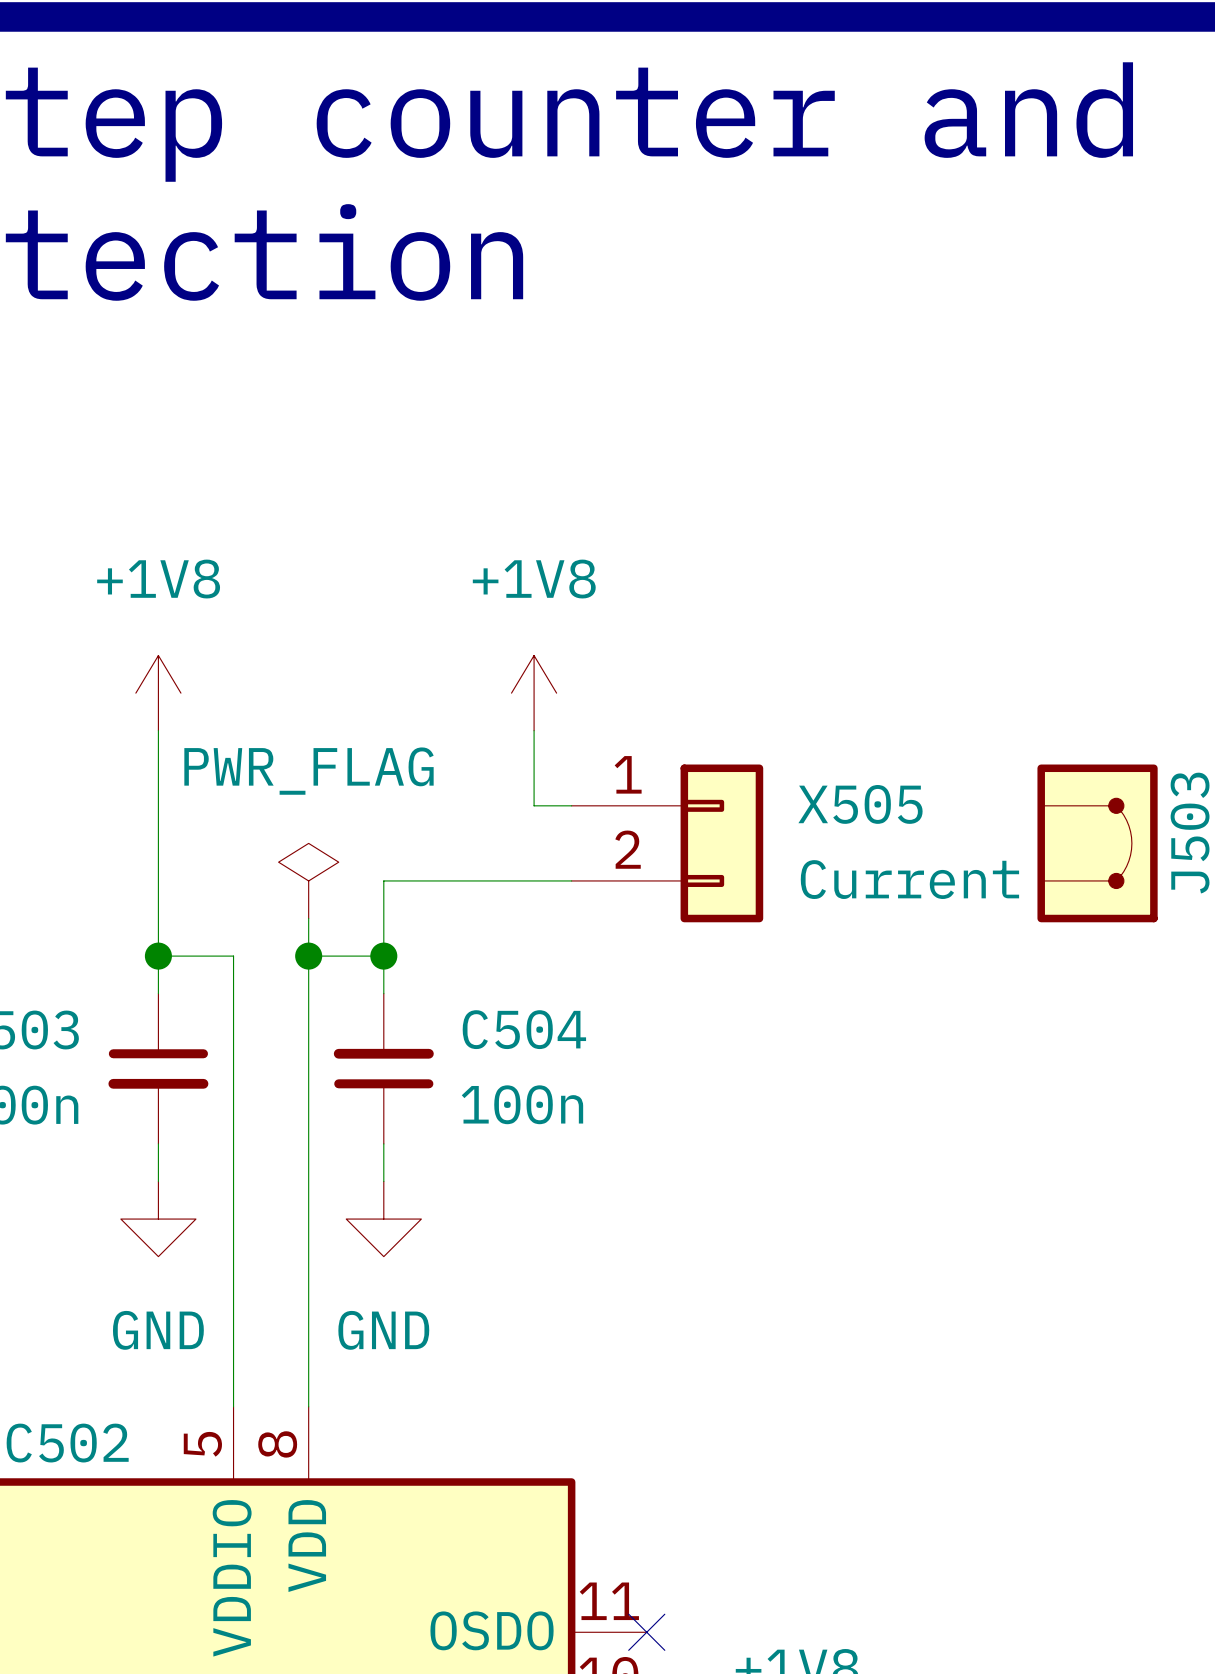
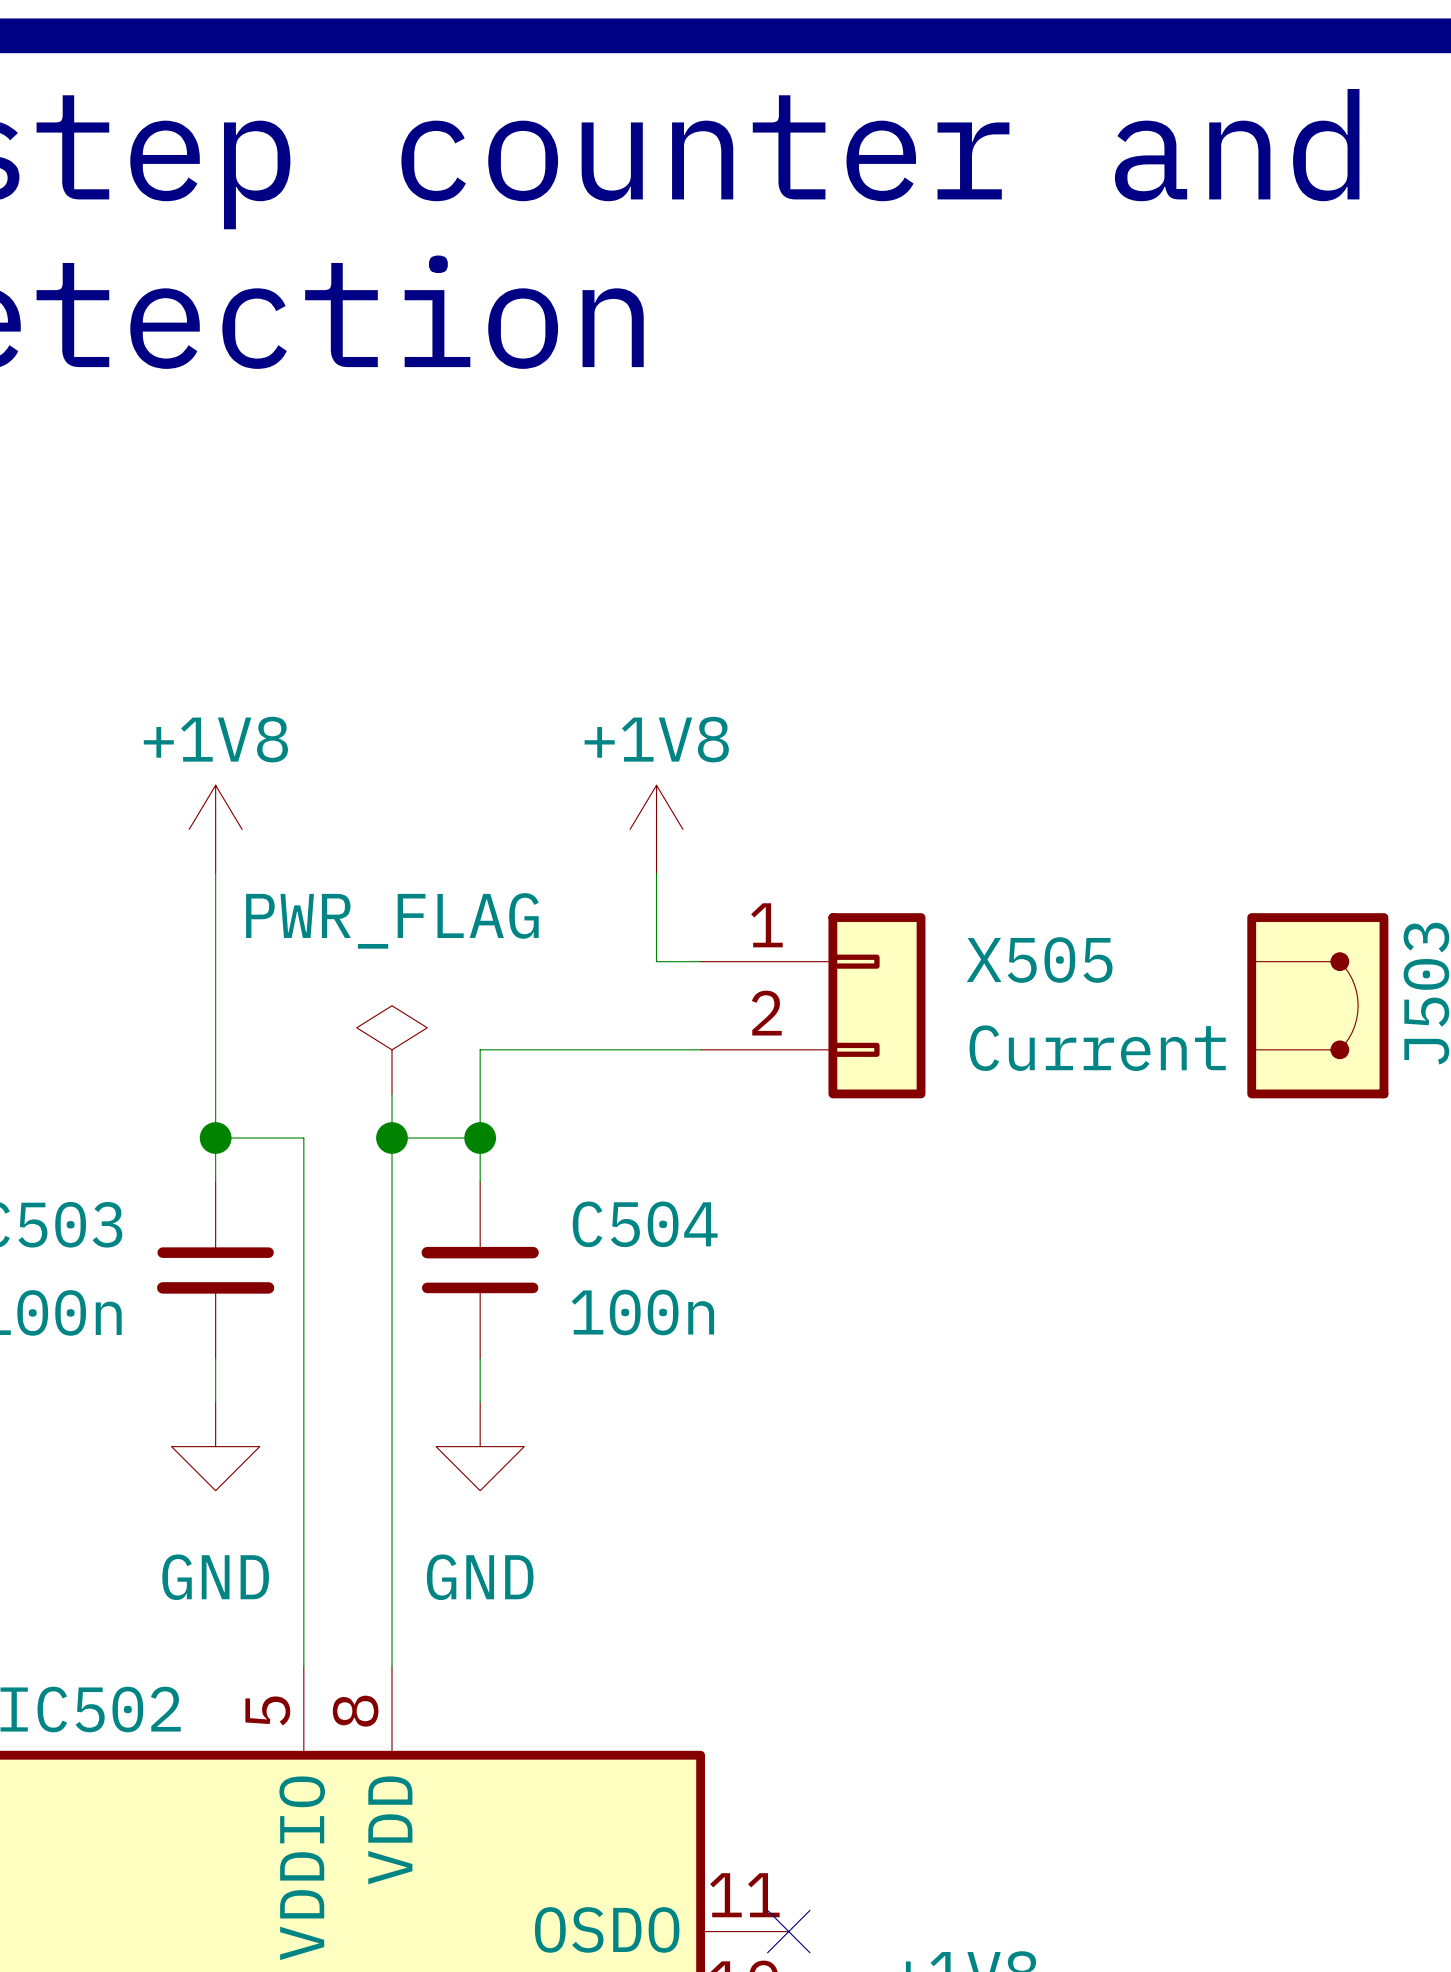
power symbol text position: +1V8 (158, 579) -> +1V8 (215, 739)
power symbol text position: +1V8 (534, 579) -> +1V8 (656, 739)

